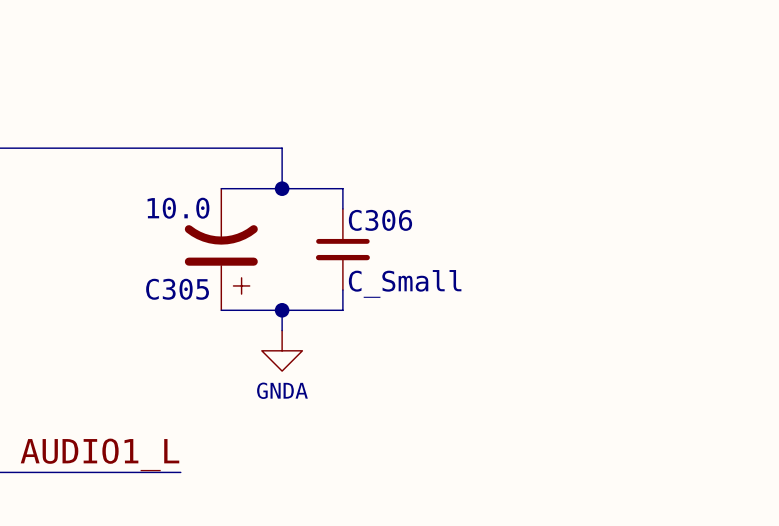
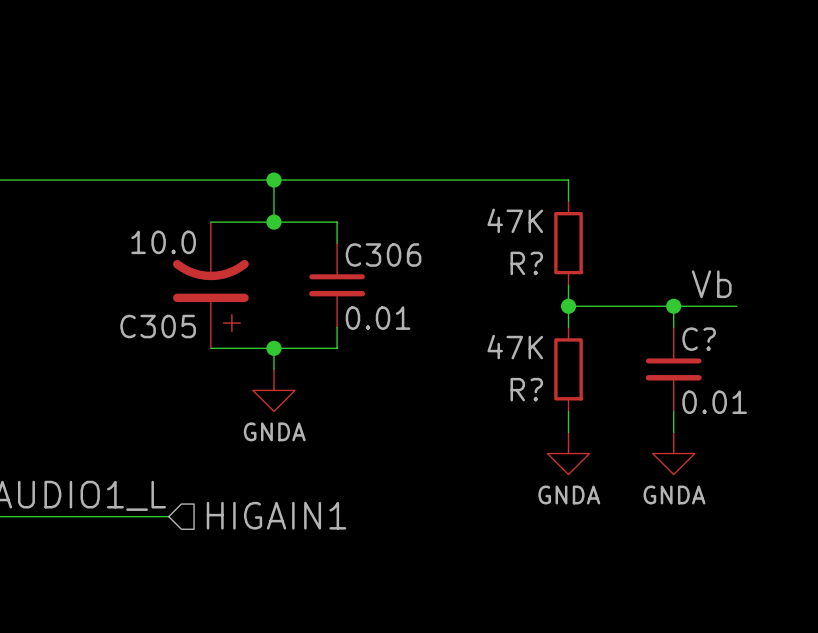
wire: none -> (273, 180) (568, 180) (568, 201)
junction: none -> (273, 180)
R?: none -> 47K (568, 243)
label: none -> Vb (711, 284)
wire: none -> (568, 285) (568, 327)
wire: none -> (568, 306) (736, 306)
junction: none -> (568, 306)
wire: none -> (673, 306) (673, 327)
junction: none -> (673, 306)
C306 value: C_Small (405, 283) -> 0.01 (378, 318)
R?: none -> 47K (568, 369)
C?: none -> 0.01 (673, 369)
wire: none -> (568, 411) (568, 432)
wire: none -> (673, 411) (673, 432)
power symbol: none -> GNDA (568, 453)
power symbol: none -> GNDA (673, 453)
hierarchical label: none -> HIGAIN1 (276, 515)

